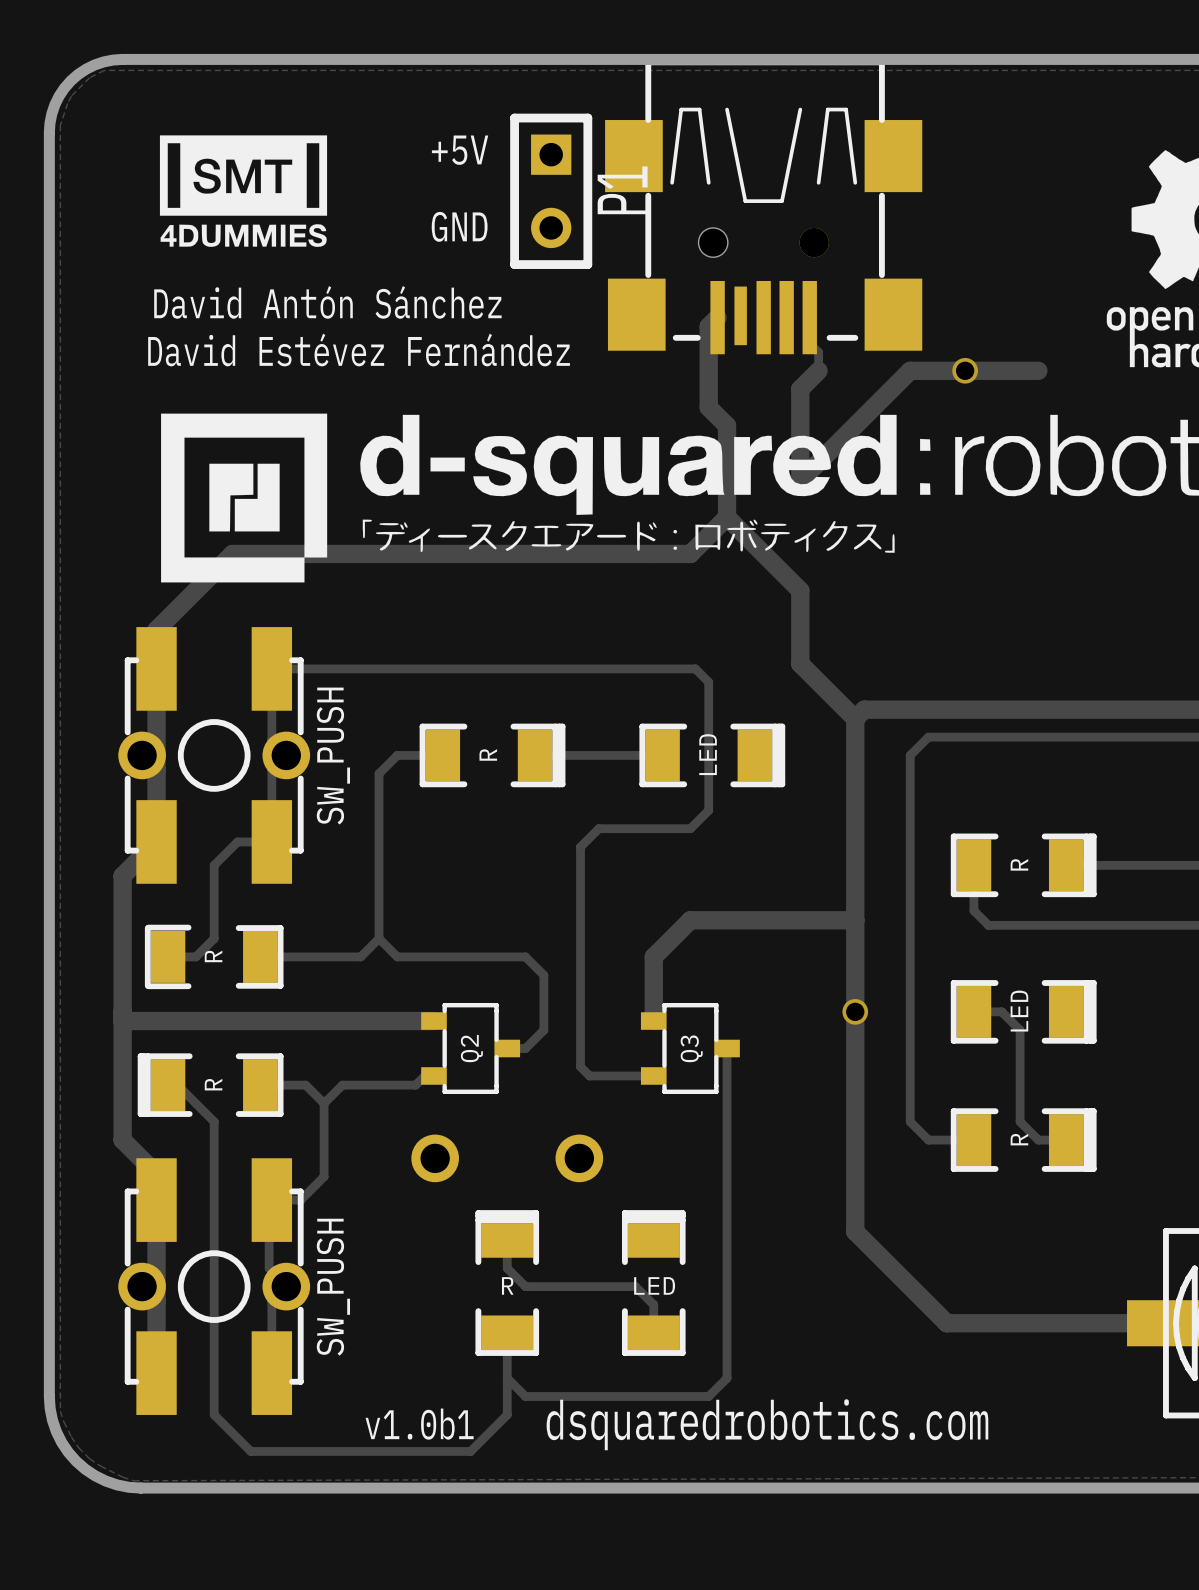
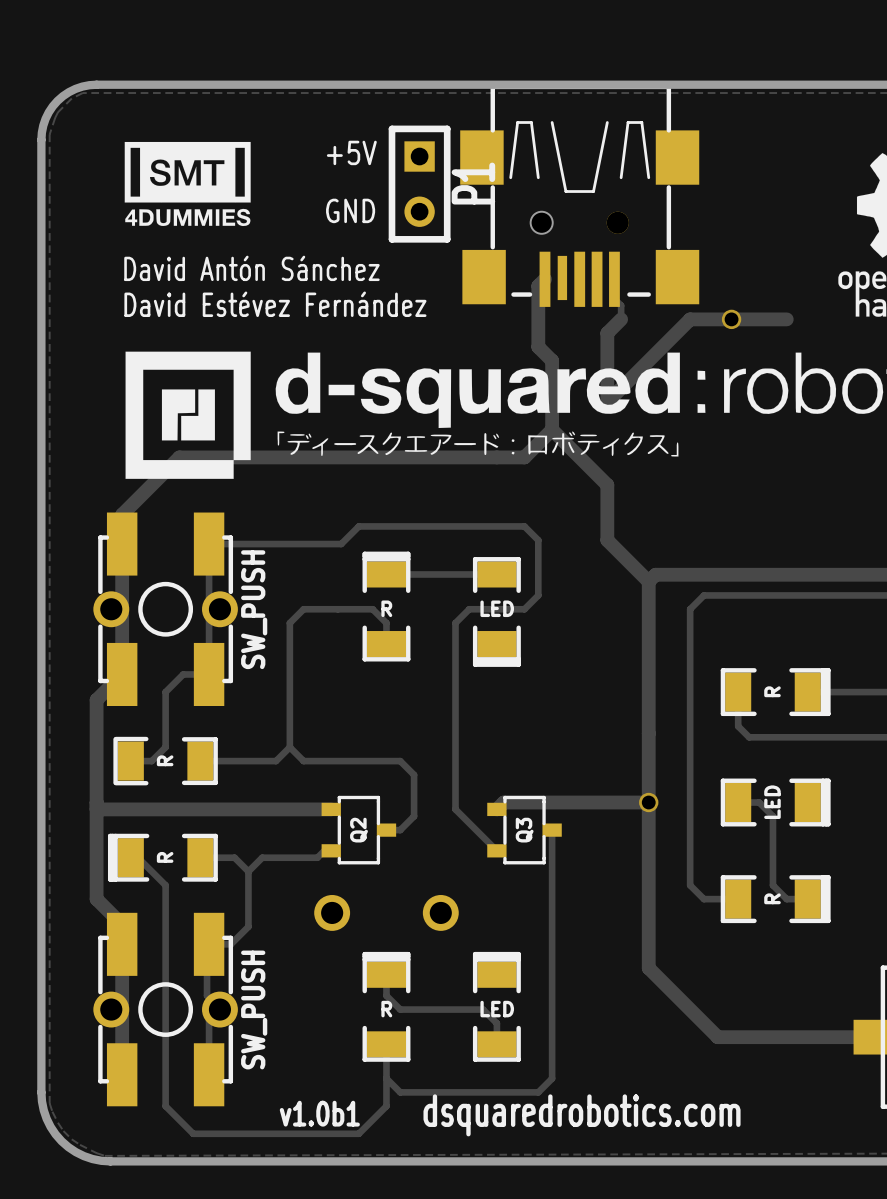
track: (447, 668) (695, 668) (708, 682) -> (341, 544) (358, 526) (524, 526) (538, 540) (538, 554)
track: none -> (386, 574) (496, 574)
track: (708, 737) (708, 810) (690, 828) (598, 828) (580, 847) (580, 1066) (589, 1075) (653, 1075) -> (469, 609) (455, 623) (455, 809) (496, 850)
track: none -> (538, 595) (524, 609) (503, 609)
track: none -> (337, 609) (372, 609) (386, 623) (386, 644)
part rotation: 0° (492, 755) -> 90° counterclockwise (386, 606)
track: (535, 755) (617, 755) -> none
part rotation: 0° (712, 755) -> 90° clockwise (496, 611)
track: (855, 920) (690, 920) (653, 956) (653, 1021) -> (648, 802) (503, 802) (496, 809)

